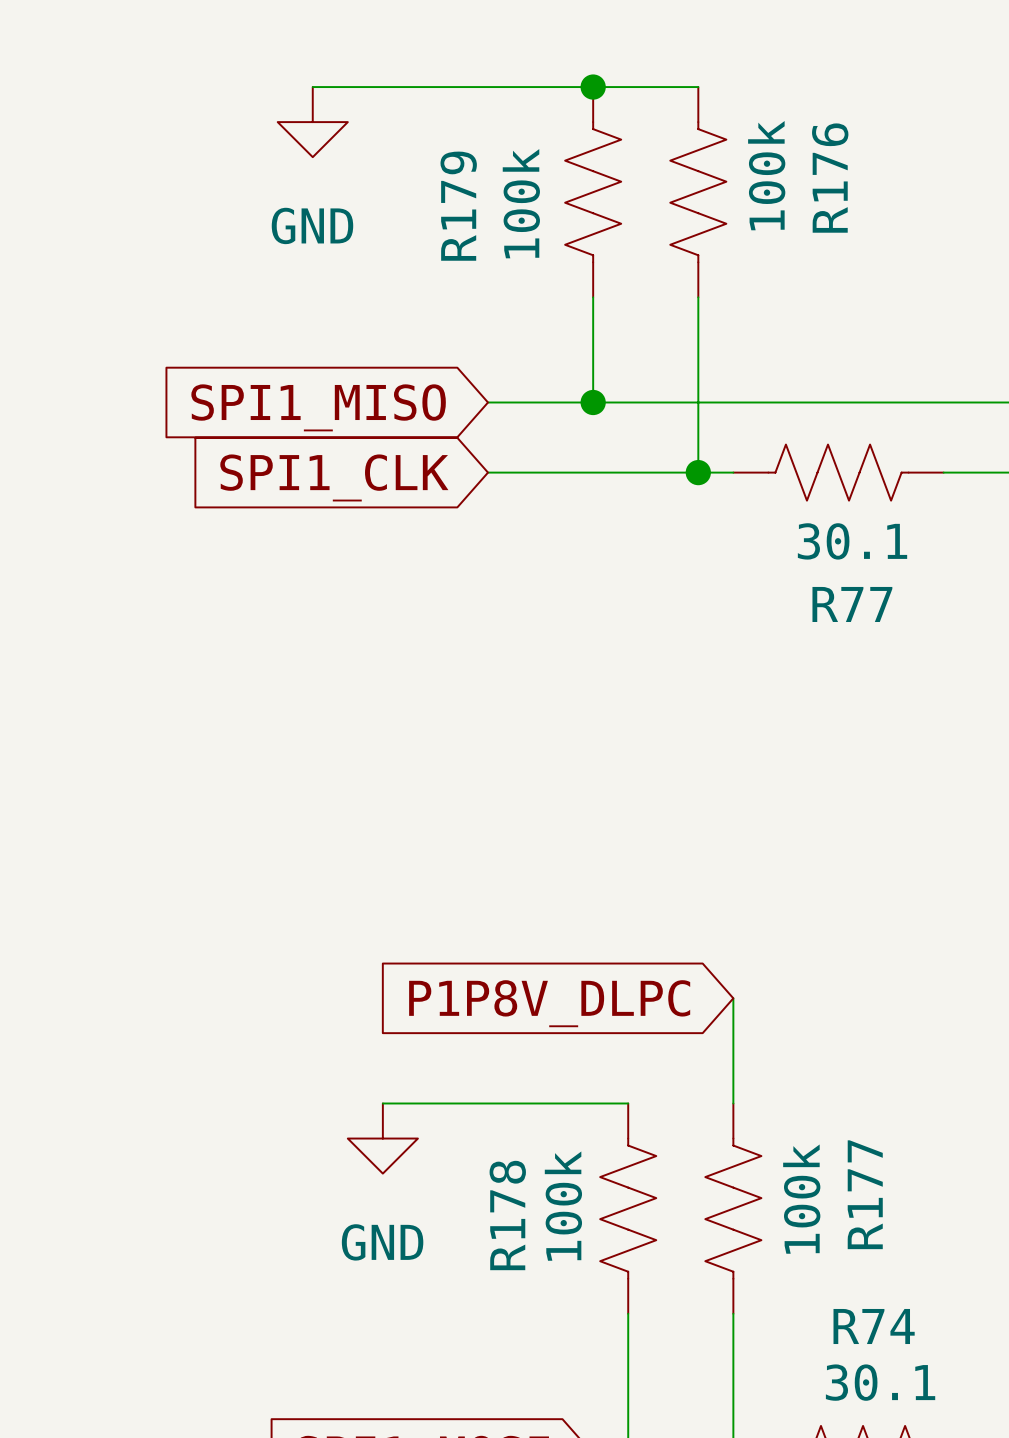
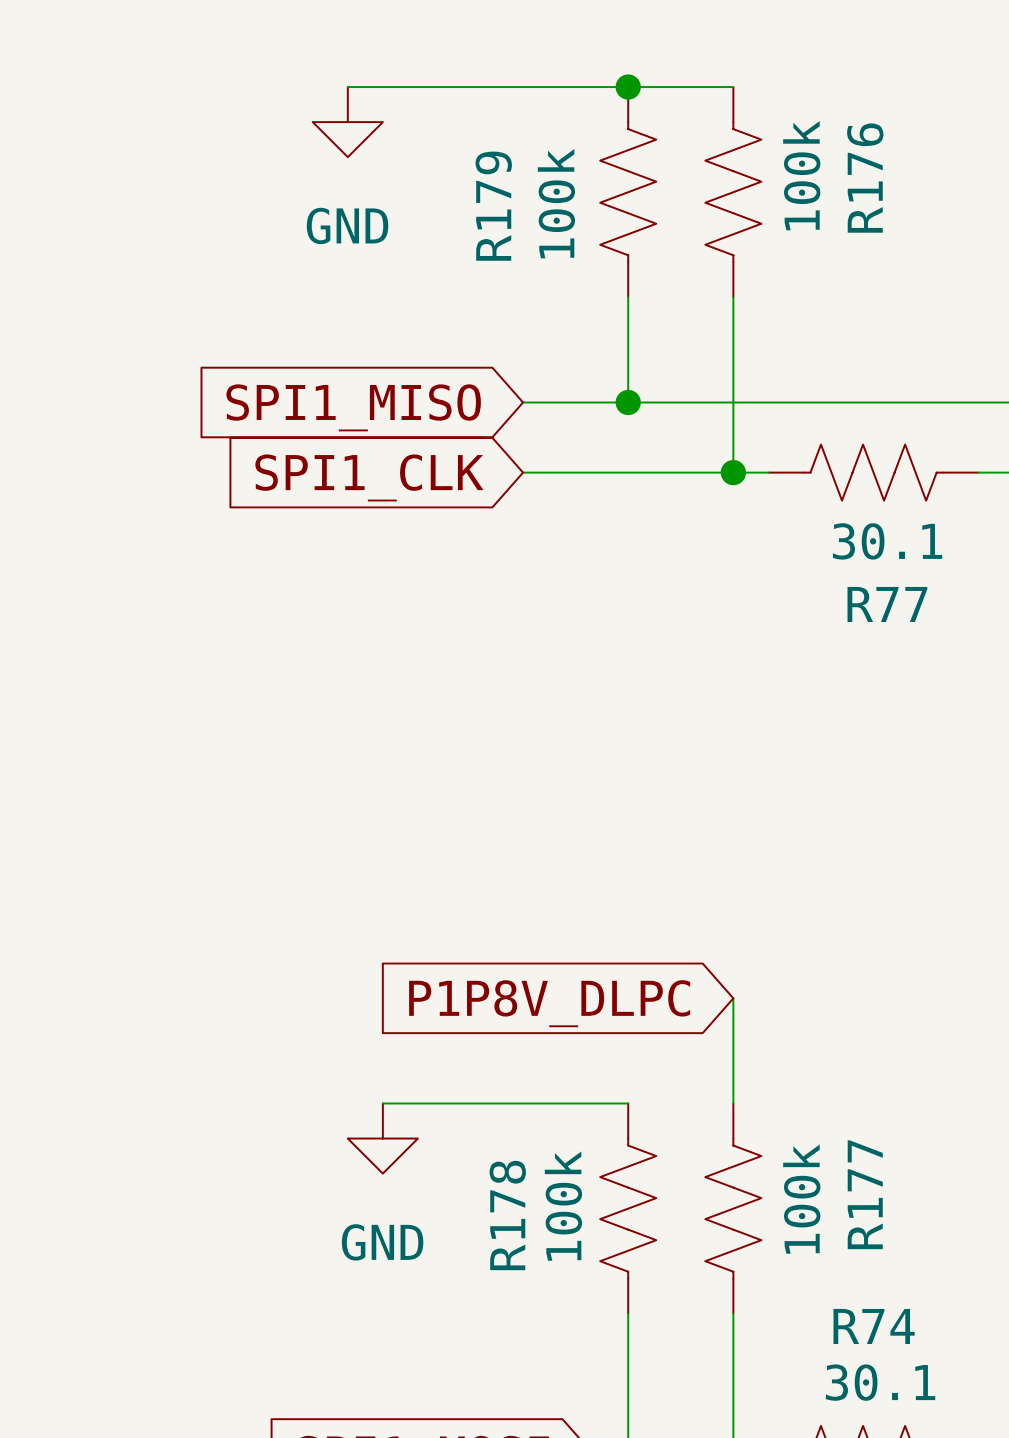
wire: (312, 87) (347, 87) -> none
junction position: (593, 87) -> (628, 87)
power symbol position: GND (312, 122) -> GND (347, 122)
R179 position: (593, 192) -> (628, 192)
R176 position: (698, 192) -> (733, 192)
wire: (593, 297) (593, 402) -> (628, 297) (628, 402)
wire: (698, 297) (698, 472) -> none
wire: none -> (733, 297) (733, 472) (768, 472)
wire: (488, 402) (523, 402) -> (698, 87) (733, 87)
junction position: (593, 402) -> (628, 402)
global label position: SPI1_MISO (318, 407) -> SPI1_MISO (353, 407)
wire: (488, 472) (523, 472) -> none
junction position: (698, 472) -> (733, 472)
R77 position: (838, 472) -> (873, 472)
global label position: SPI1_CLK (334, 477) -> SPI1_CLK (369, 477)

